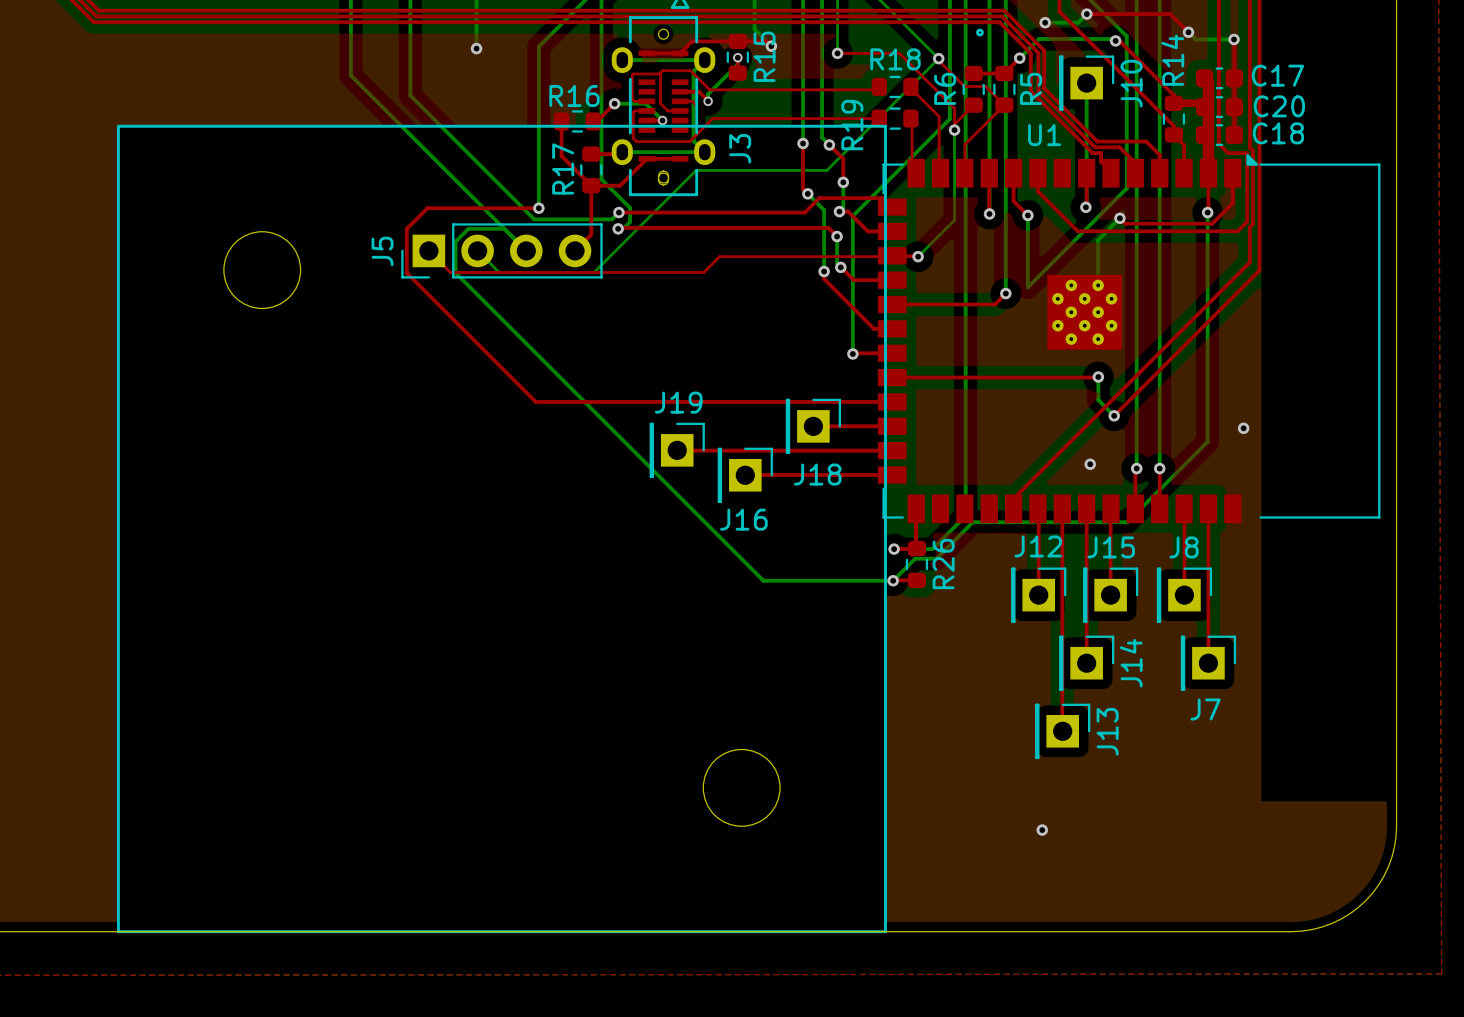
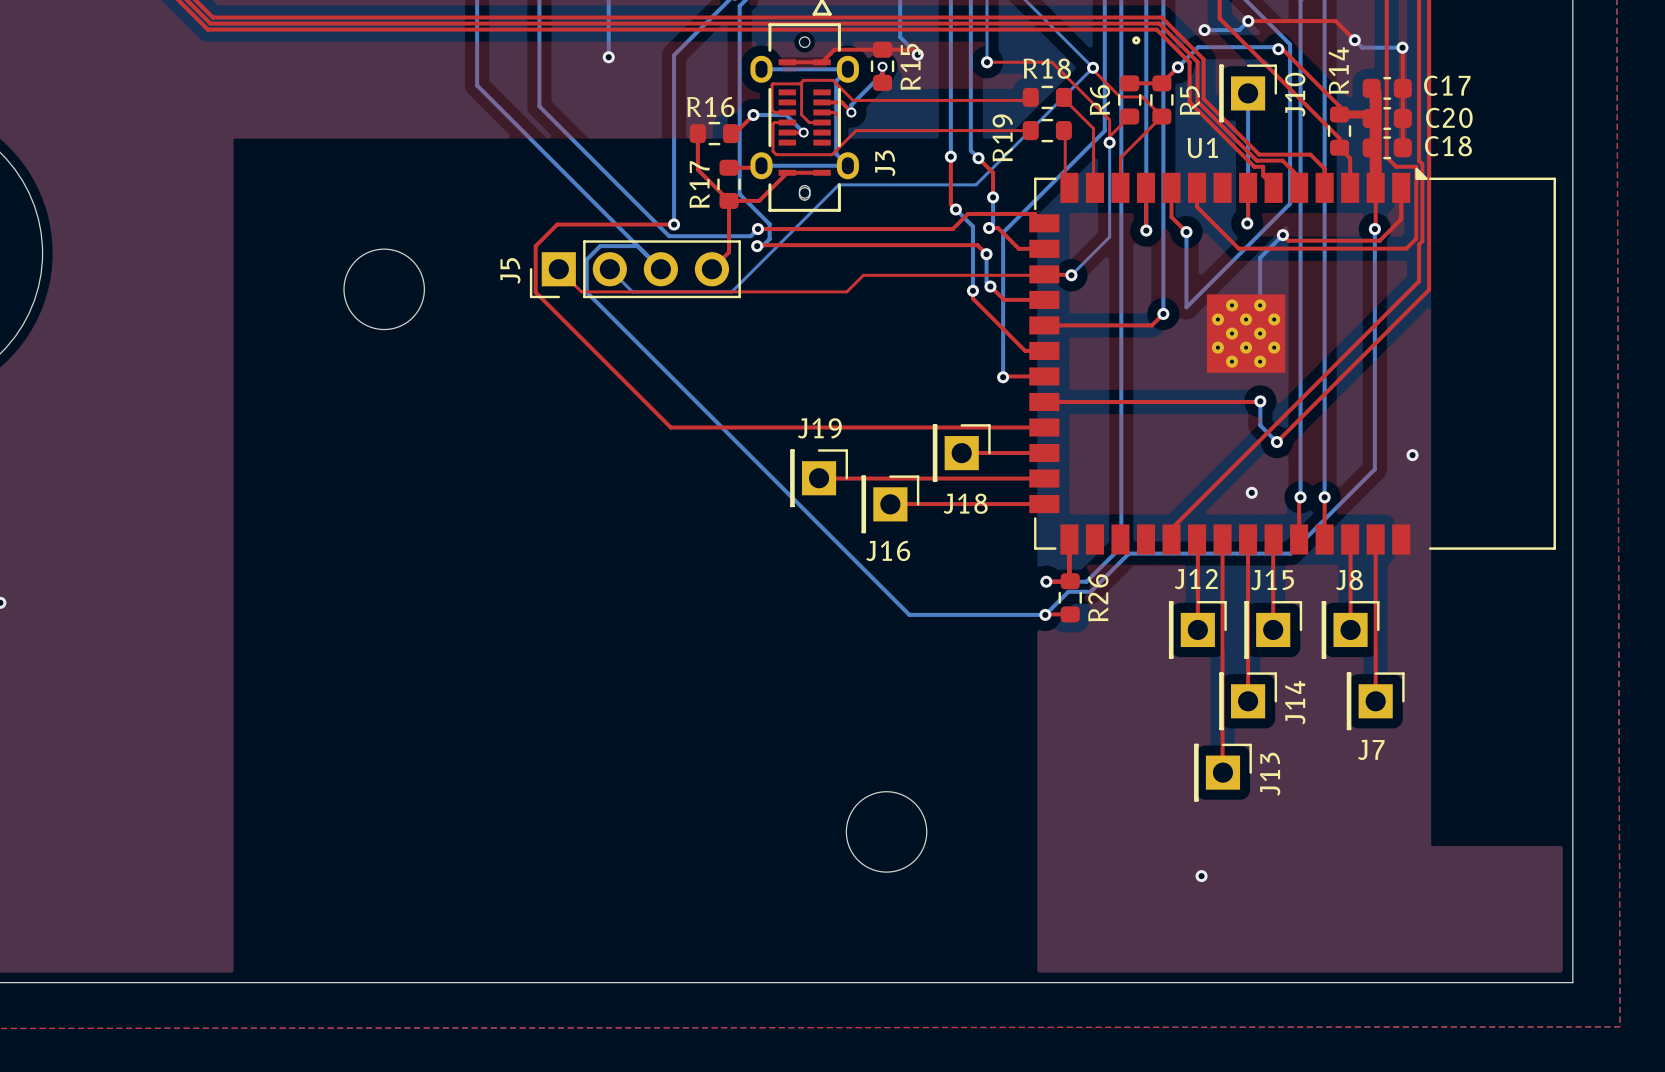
line: (118, 126) (885, 126) (885, 931) (118, 931) (118, 126) -> none
board edge: (1396, 826) (1394, 846) (1388, 866) (1378, 884) (1365, 900) (1349, 913) (1331, 923) (1311, 929) (1291, 931) -> (1572, 872) (1572, 982) (1462, 982)

